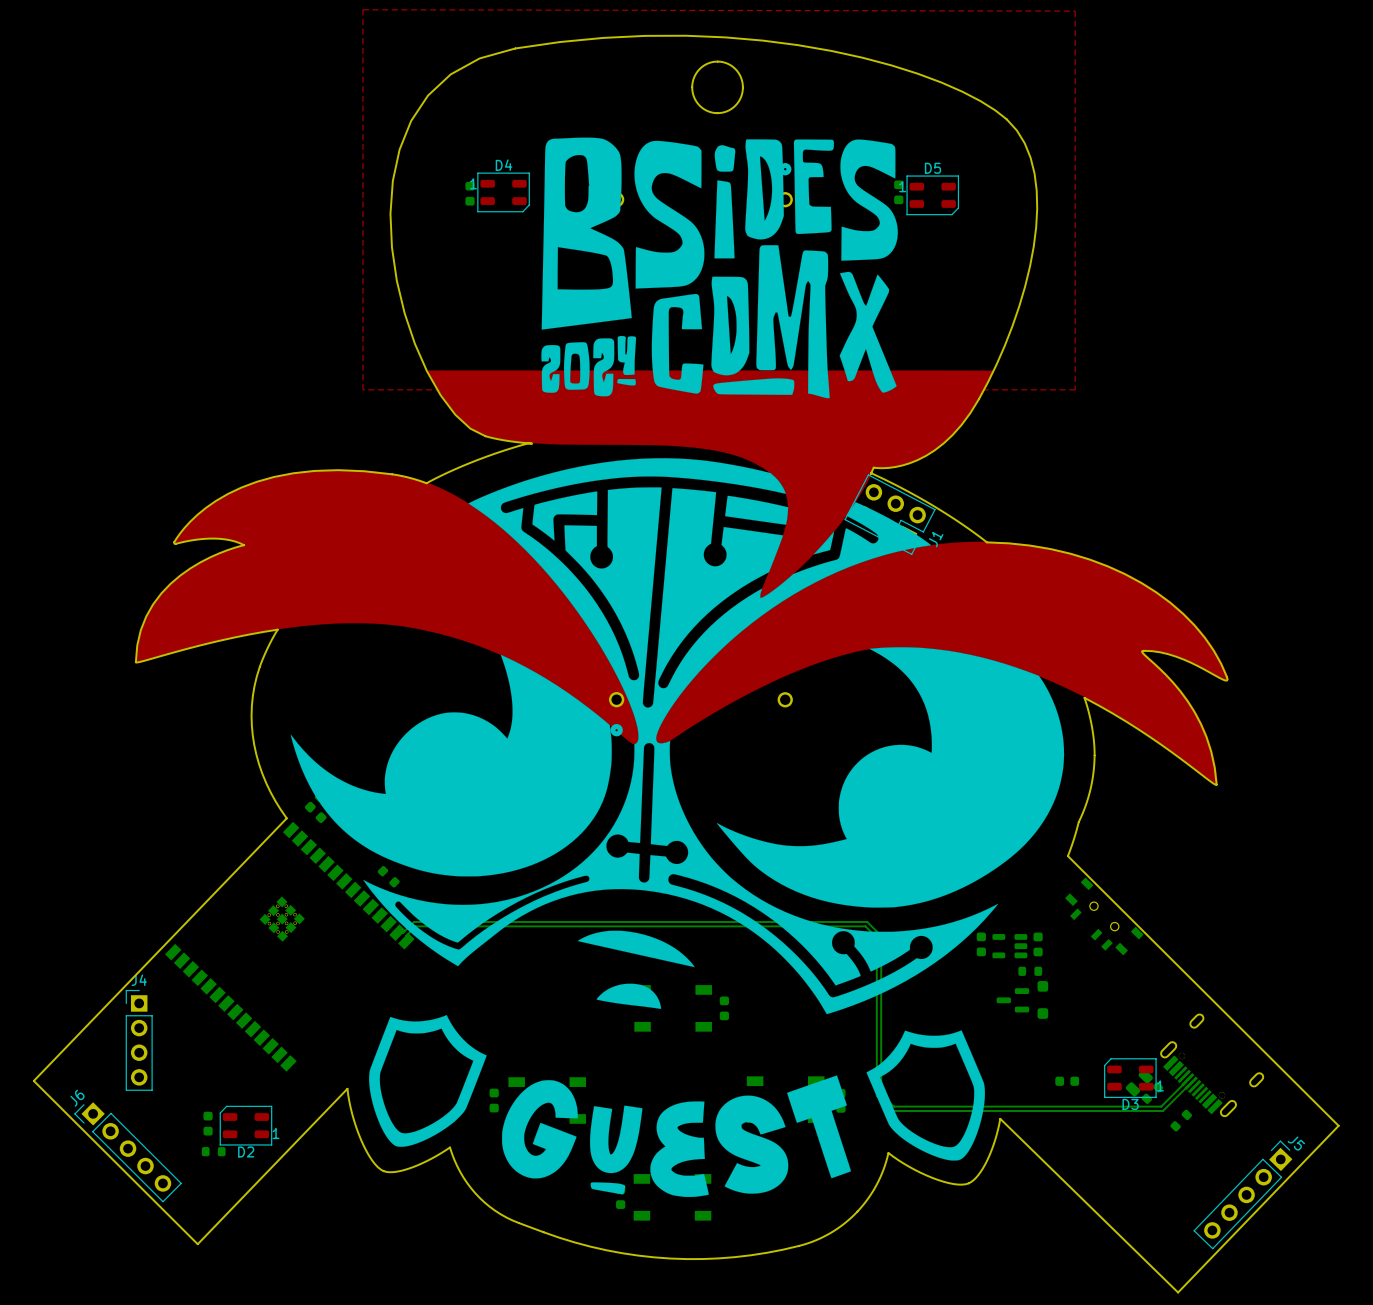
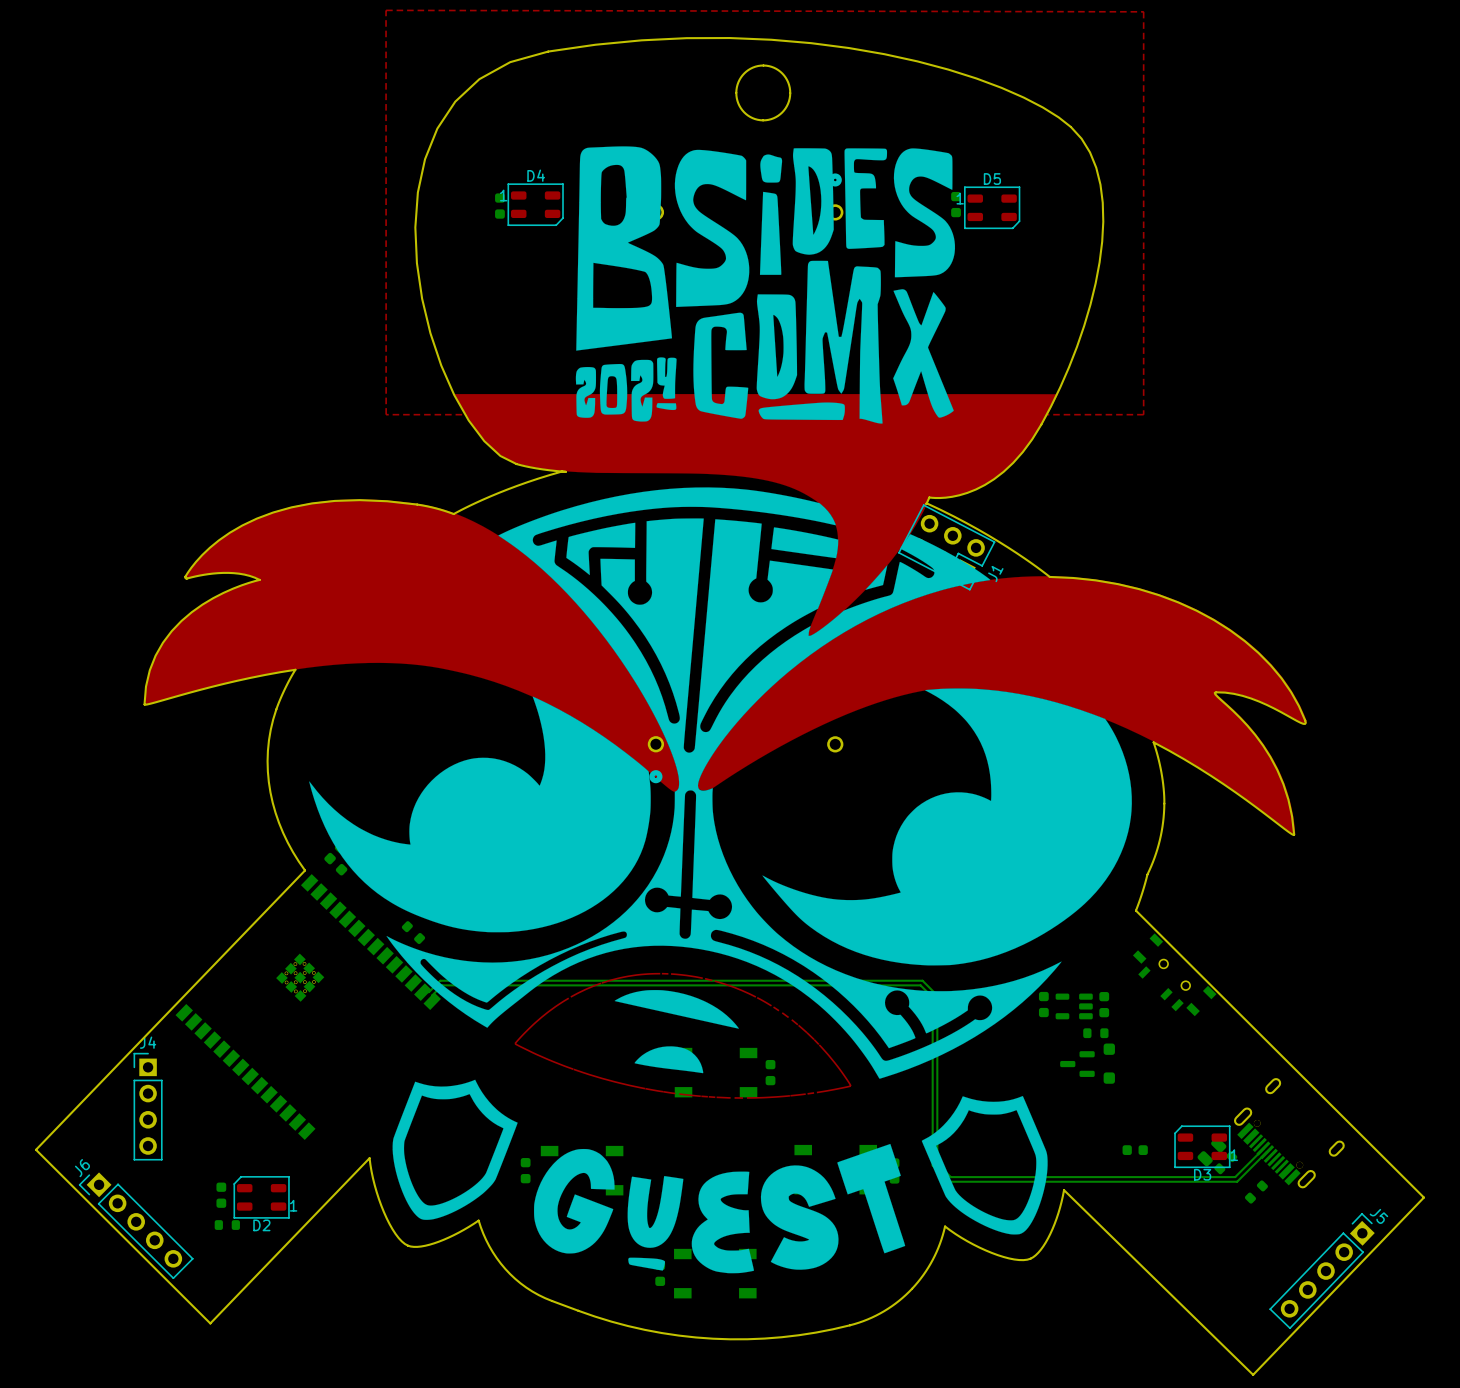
top zone outline: none -> (806, 1032) (773, 1007) (735, 987) (696, 976) (653, 973) (612, 979) (577, 993) (541, 1017) (515, 1043) (549, 1060) (589, 1074) (629, 1085) (672, 1093) (715, 1097) (762, 1097) (805, 1094) (850, 1086) (829, 1055) (807, 1032)

